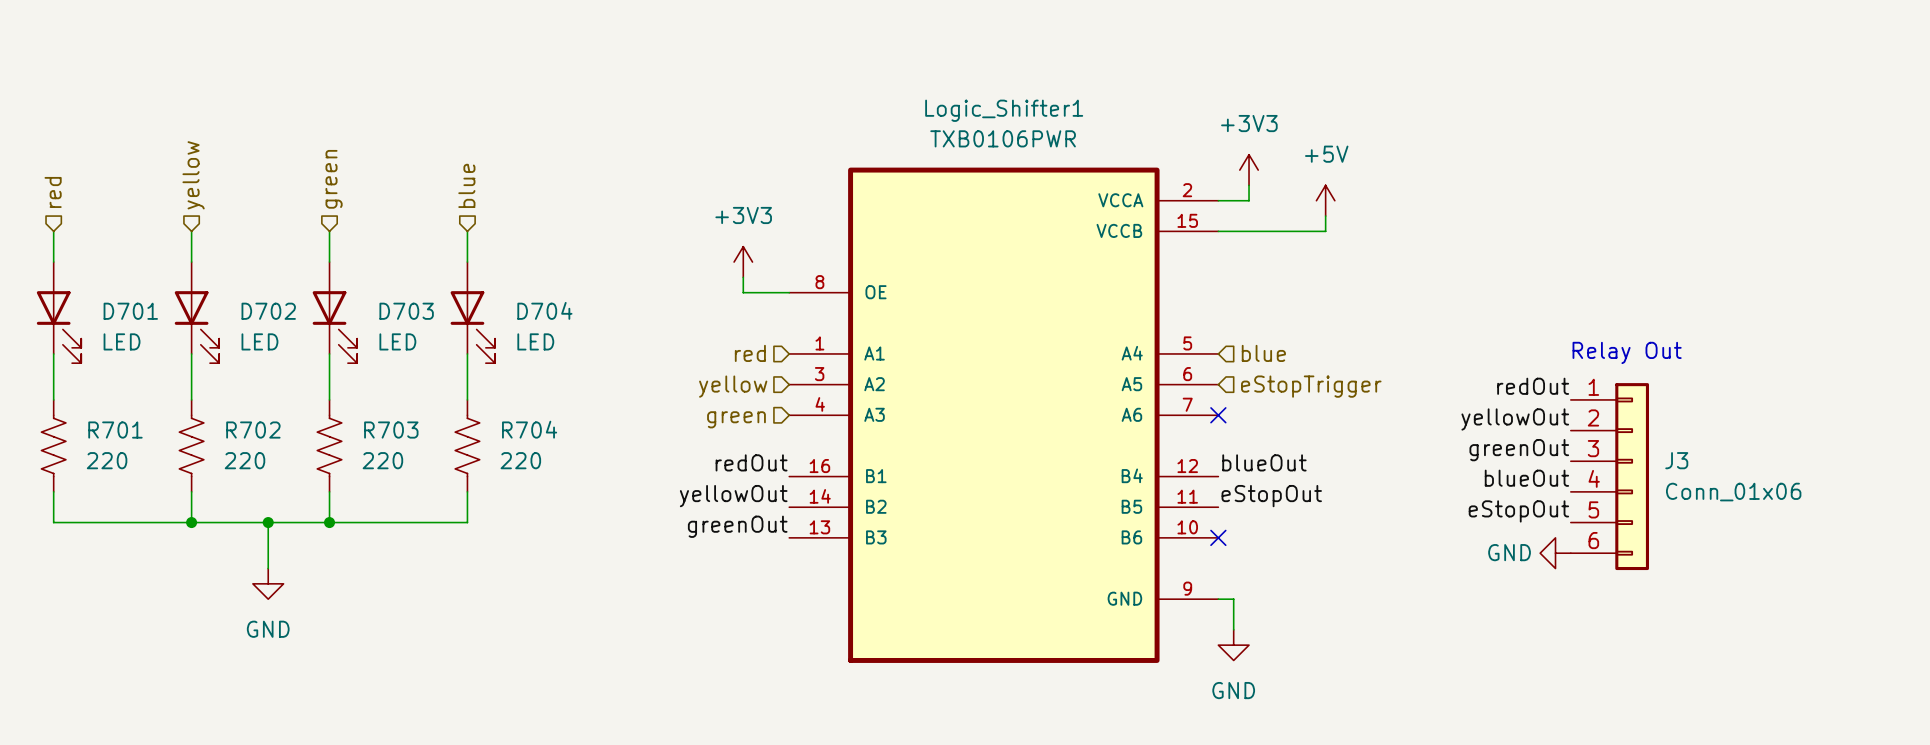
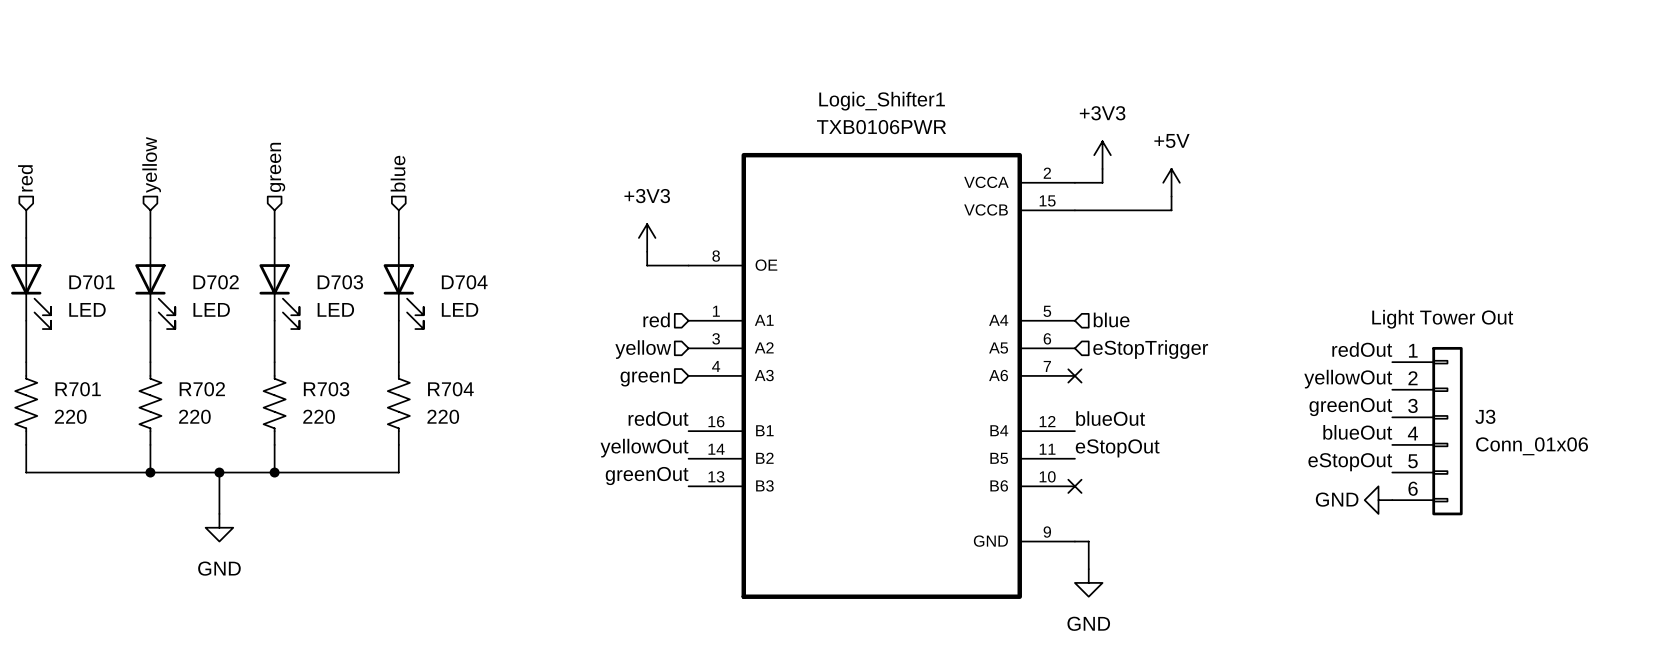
text: Relay Out (1627, 352) -> Light Tower Out (1442, 319)

